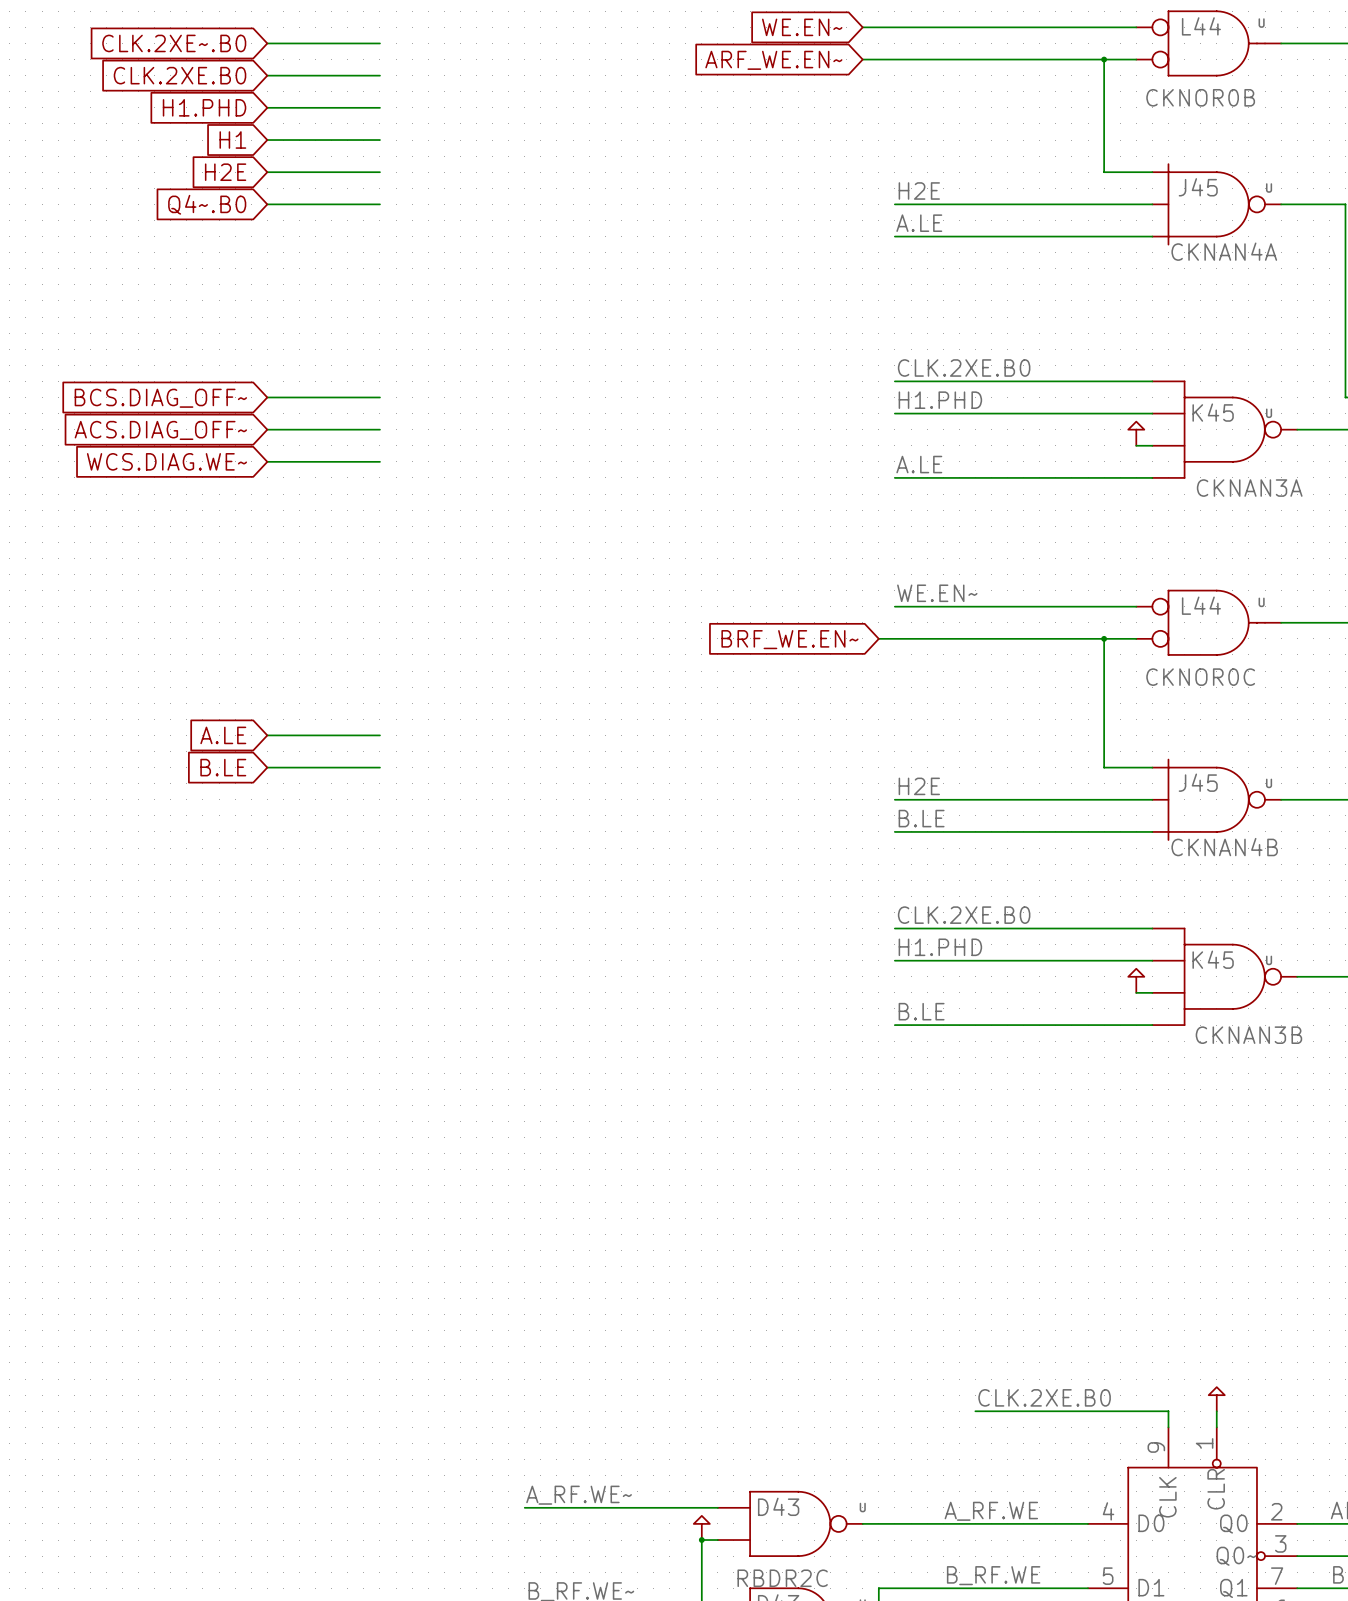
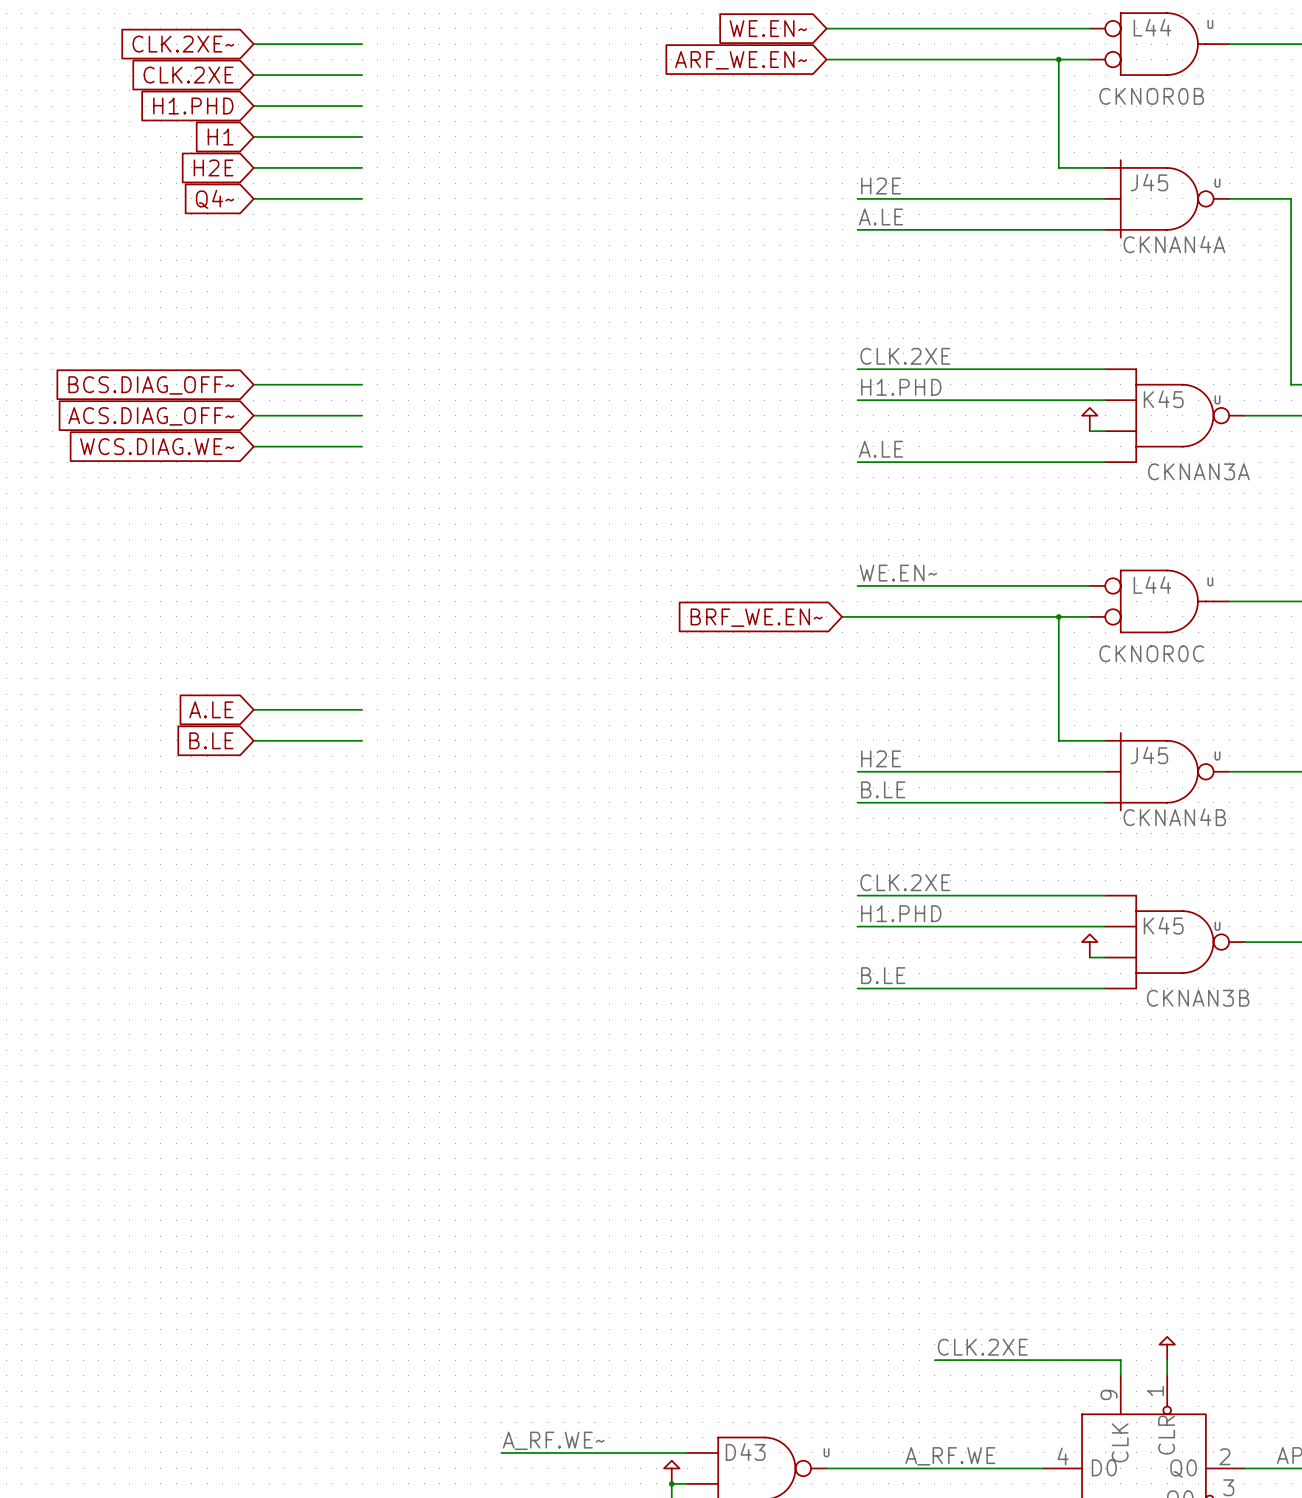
global label: CLK.2XE~.B0 (174, 43) -> CLK.2XE~ (183, 44)
global label: CLK.2XE.B0 (180, 75) -> CLK.2XE (188, 75)
global label: Q4~.B0 (207, 204) -> Q4~ (215, 199)
label: CLK.2XE.B0 (964, 367) -> CLK.2XE (905, 356)
label: CLK.2XE.B0 (964, 915) -> CLK.2XE (905, 882)
label: CLK.2XE.B0 (1044, 1397) -> CLK.2XE (982, 1347)

